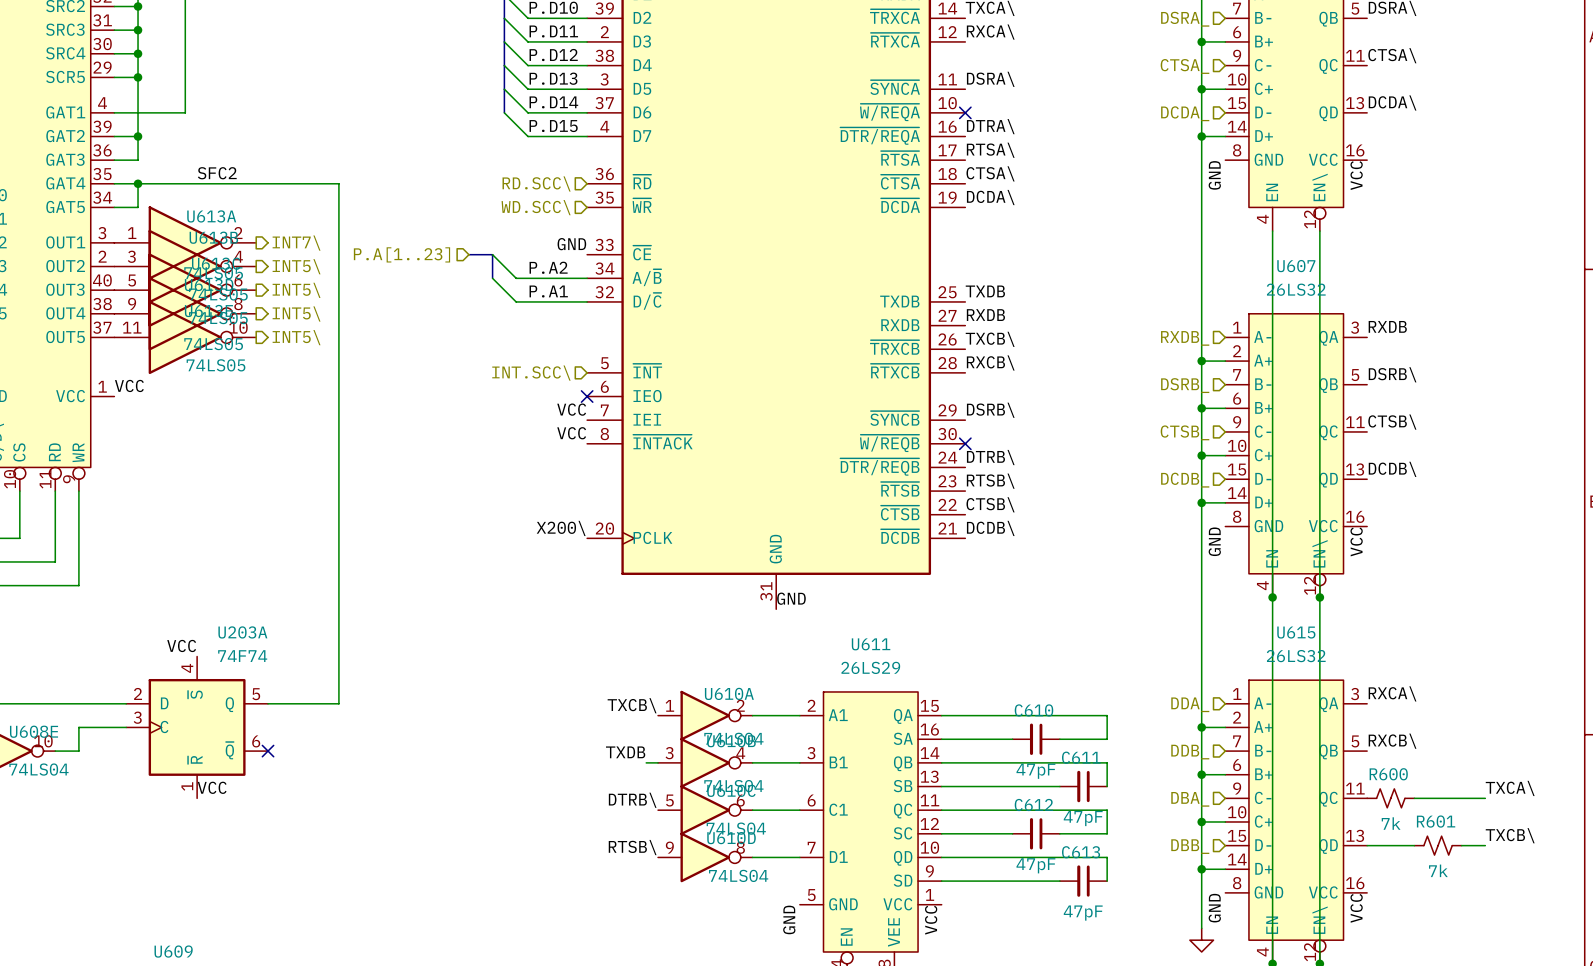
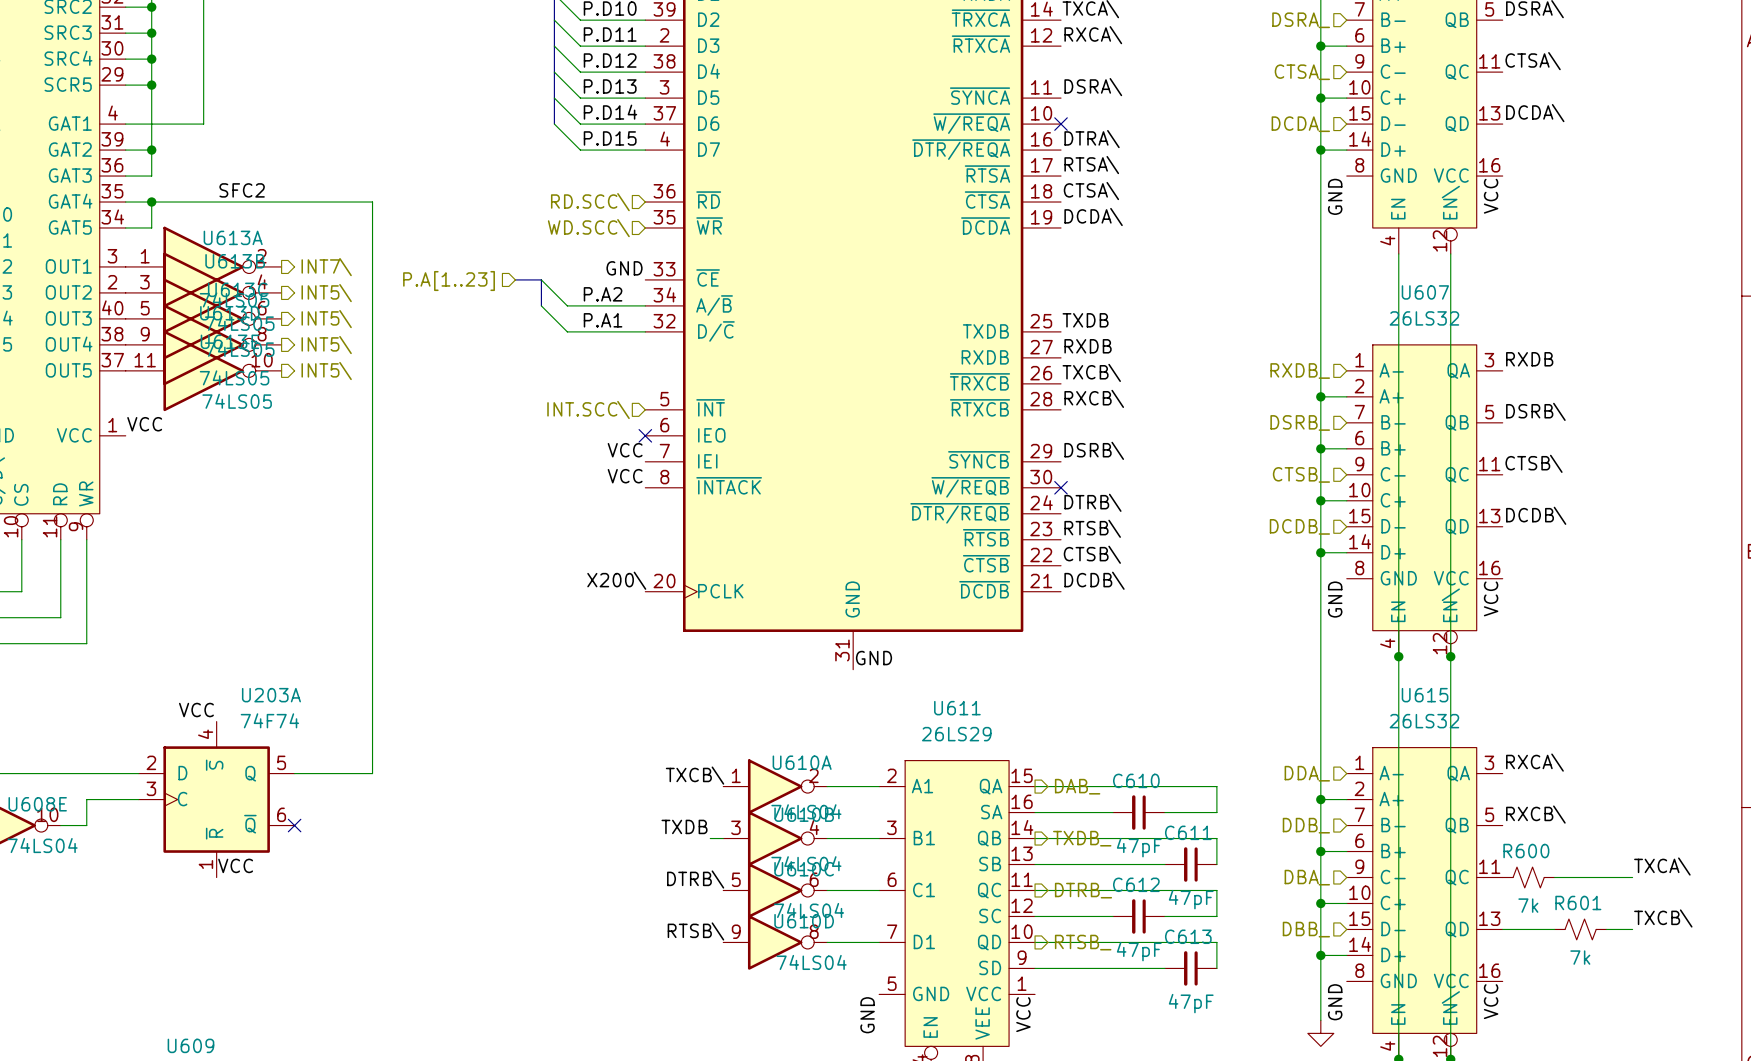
hierarchical label: none -> DAB_ (1077, 786)
hierarchical label: none -> TXDB_ (1082, 838)
hierarchical label: none -> DTRB_ (1083, 890)
hierarchical label: none -> RTSB_ (1083, 942)

